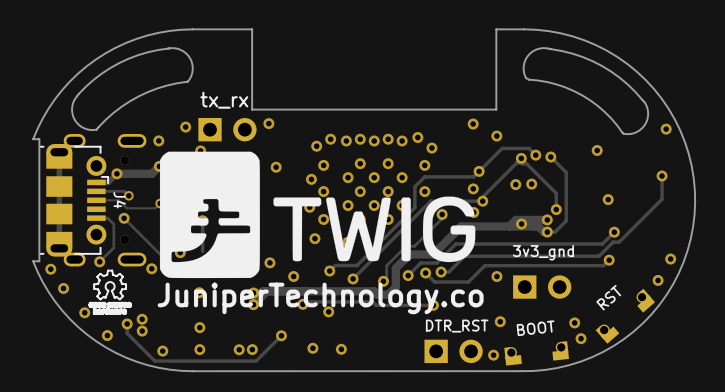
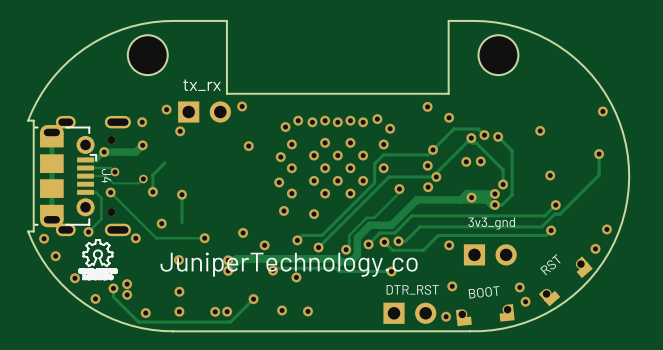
board edge: (169, 48) (147, 52) (128, 58) (93, 79) (78, 94) (73, 103) (72, 113) (76, 122) (86, 129) (96, 129) (113, 113) (138, 96) (167, 85) (187, 81) (192, 70) (190, 58) (181, 50) (169, 48) -> none
board edge: (548, 48) (582, 56) (601, 65) (619, 77) (645, 104) (648, 115) (643, 127) (635, 132) (623, 133) (604, 111) (582, 95) (556, 84) (526, 78) (523, 65) (527, 56) (538, 48) (548, 48) -> none
part: none -> (147, 55)
part: none -> (498, 55)
drawing: [159, 151, 476, 279] -> none

